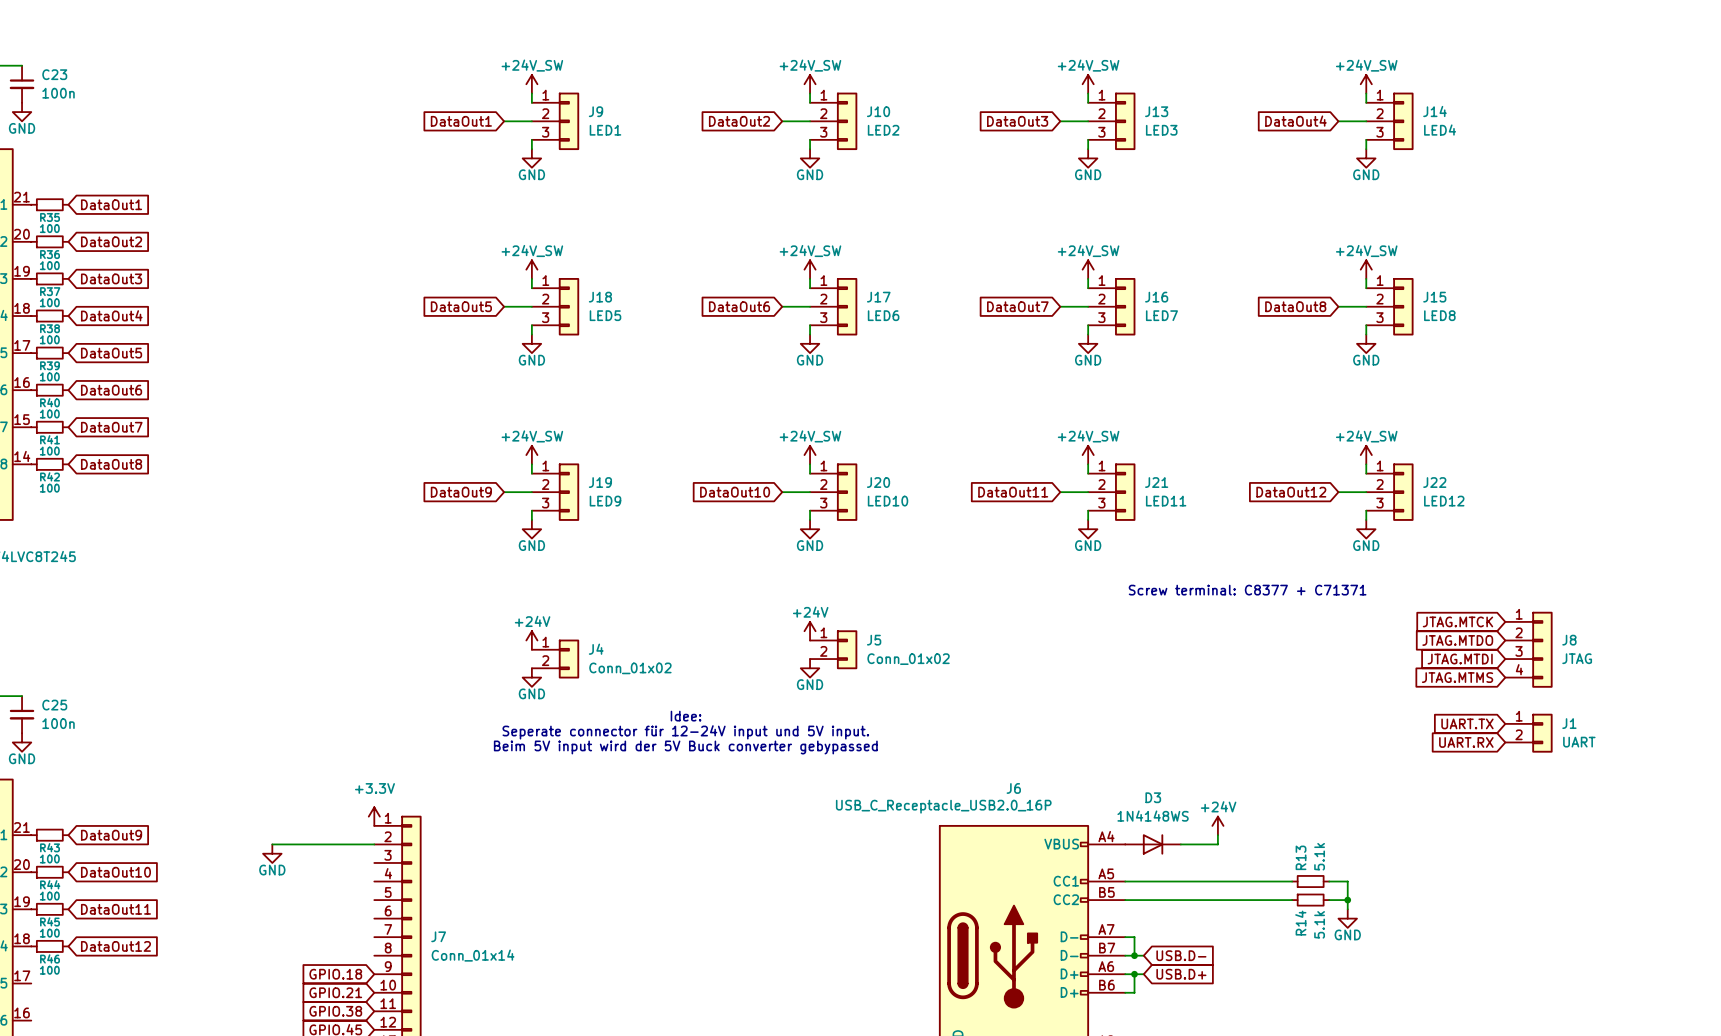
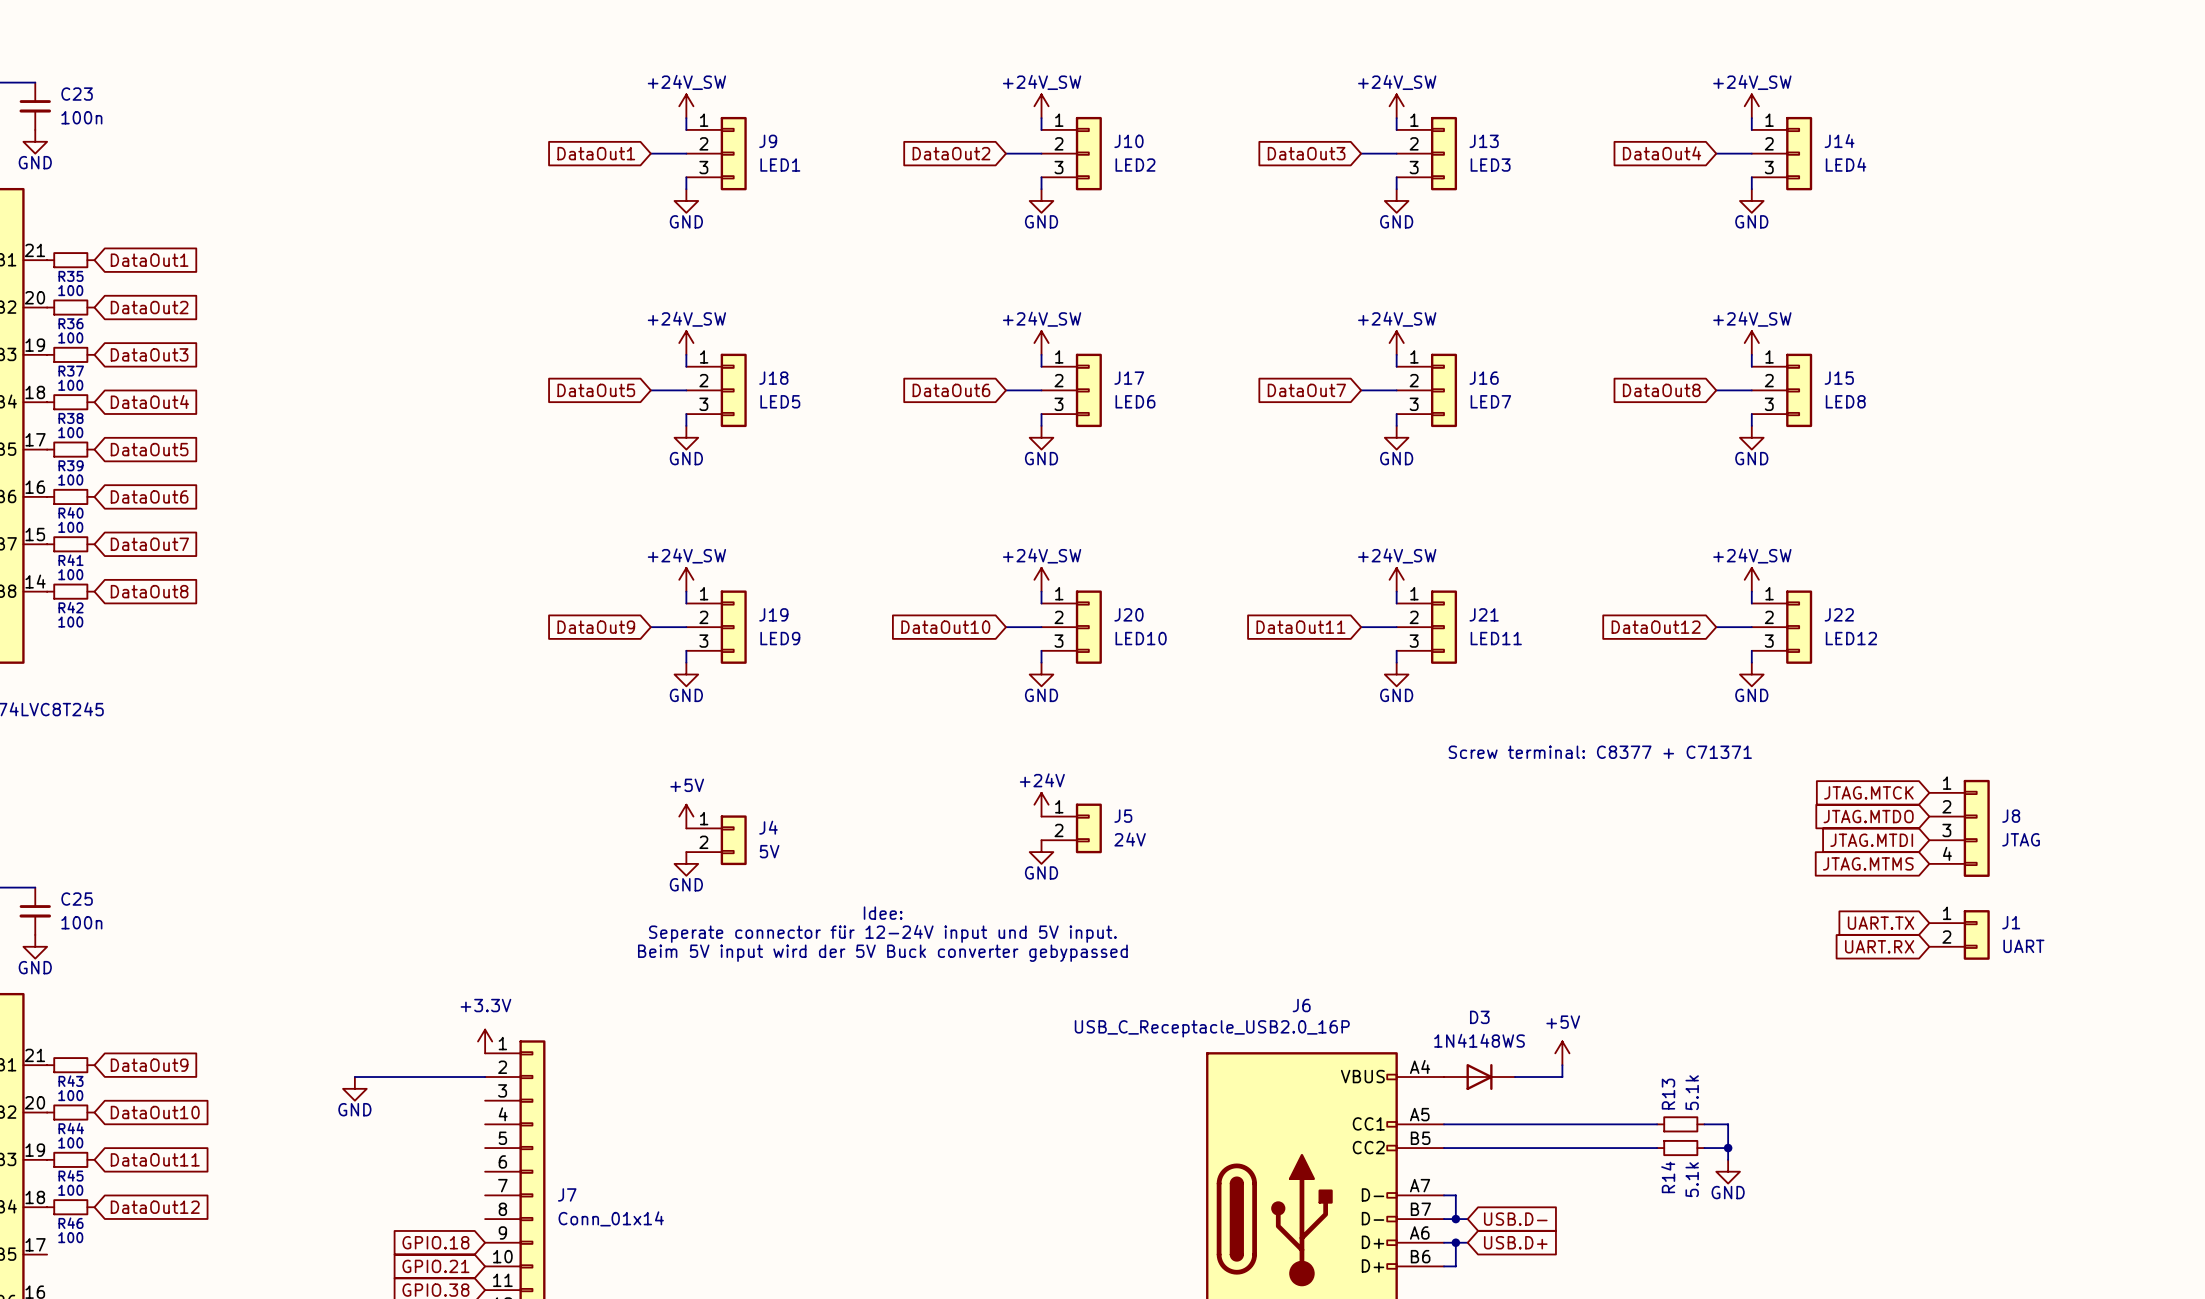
power symbol: +24V (531, 640) -> +5V (686, 816)
J5 value: Conn_01x02 (908, 659) -> 24V (1130, 839)
J4 value: Conn_01x02 (630, 668) -> 5V (769, 851)
power symbol: +24V (1217, 825) -> +5V (1562, 1053)

